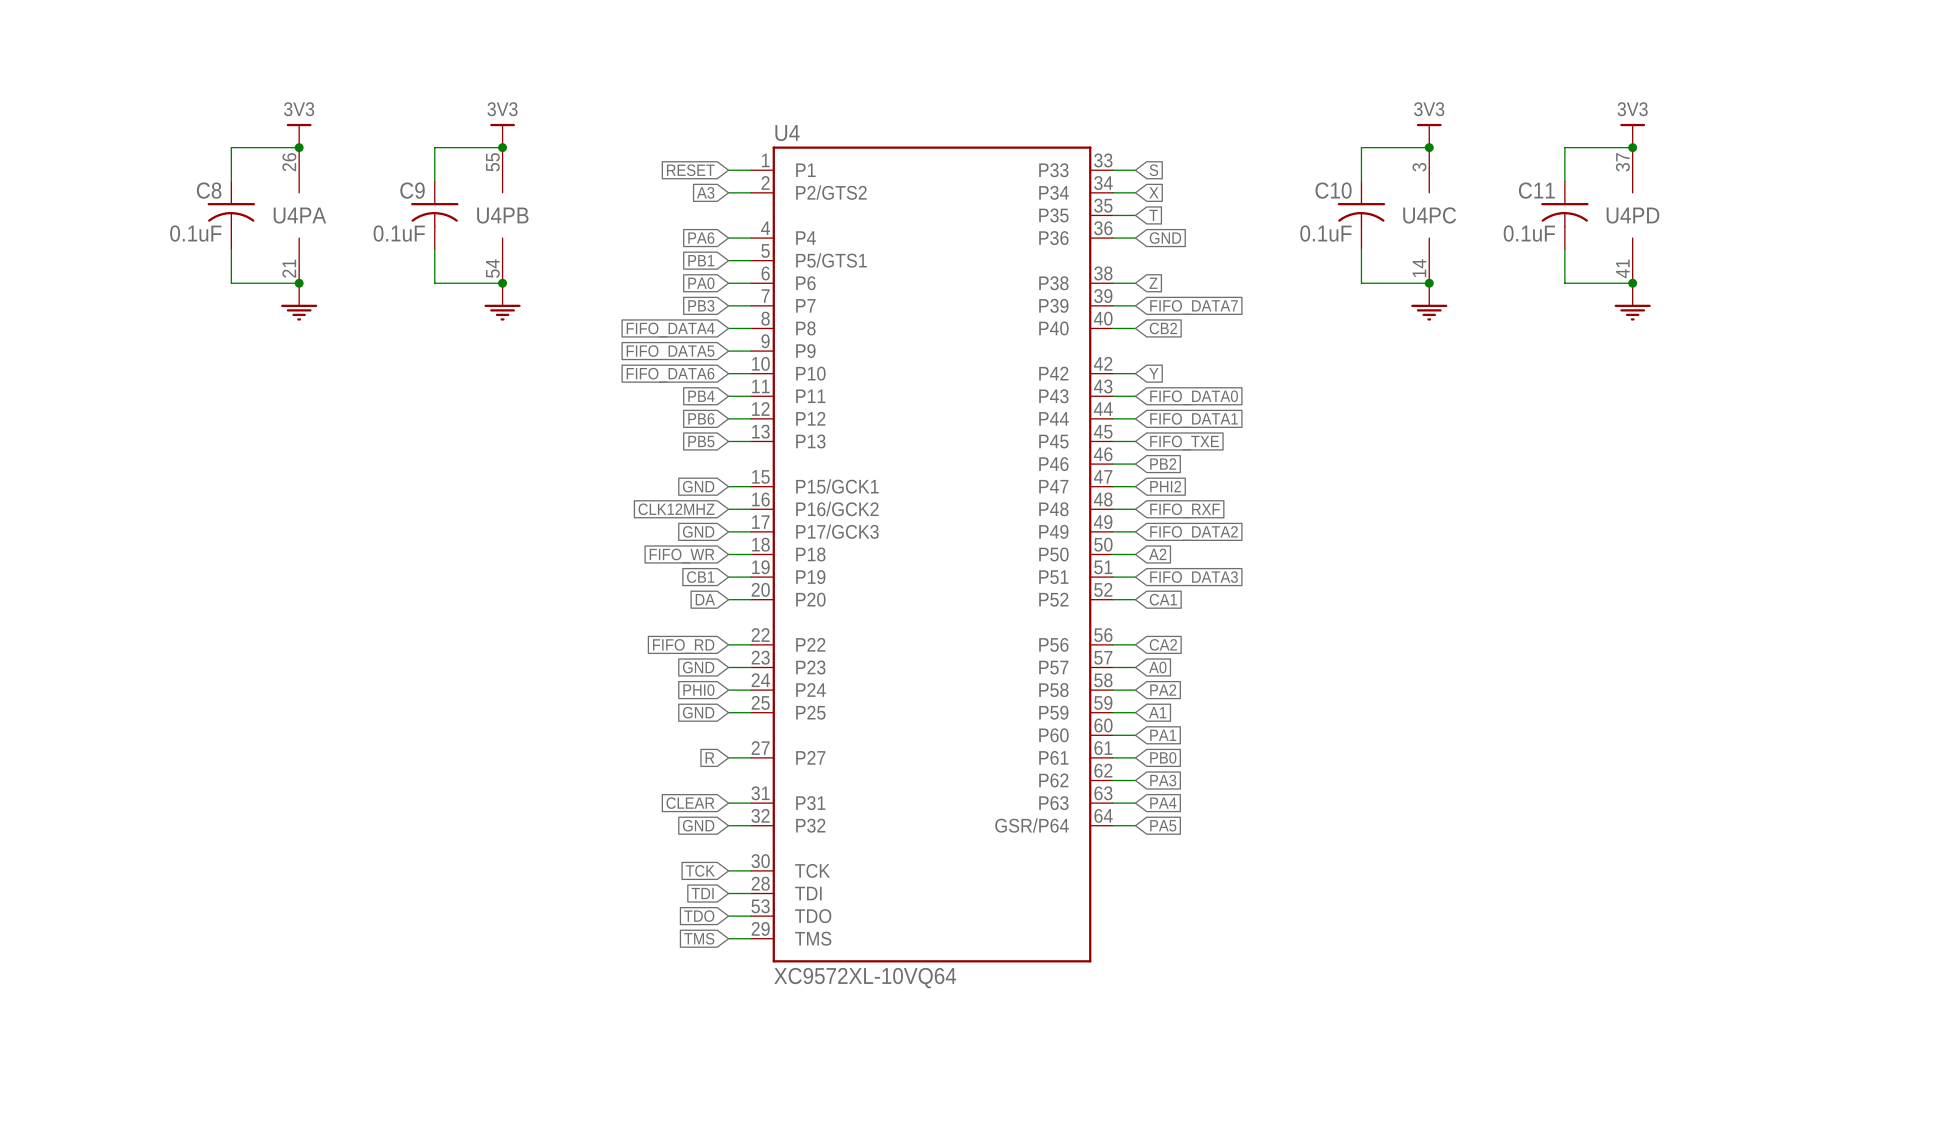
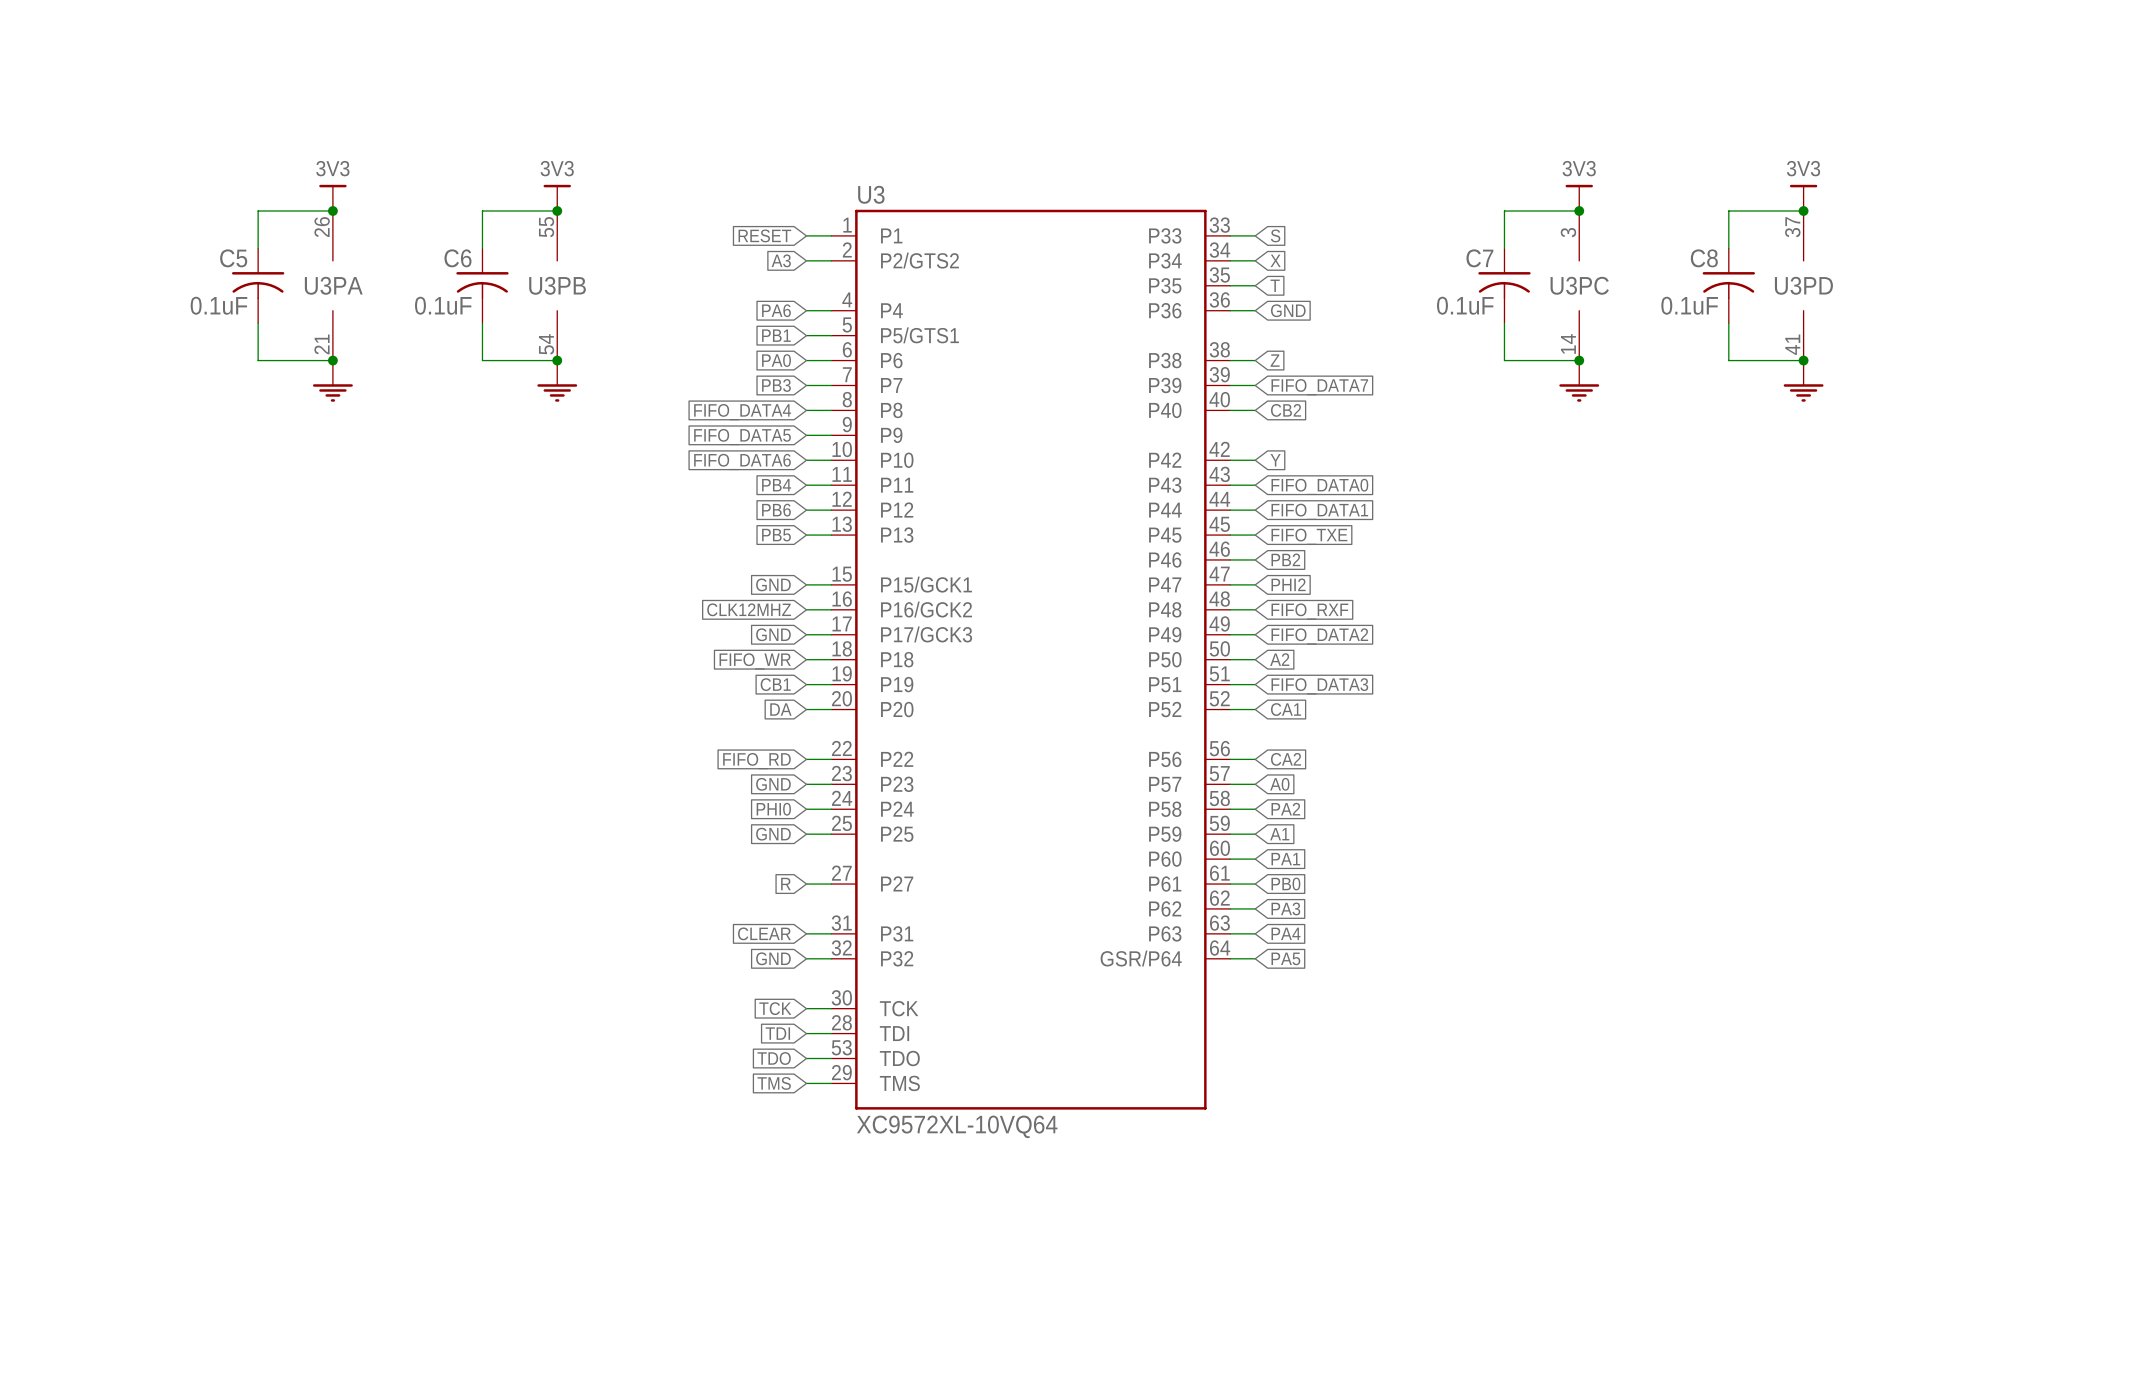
U4 name: U4 (787, 133) -> U3 (871, 194)
C8 name: C8 (209, 190) -> C5 (233, 258)
C9 name: C9 (412, 190) -> C6 (457, 258)
C10 name: C10 (1333, 190) -> C7 (1479, 258)
C11 name: C11 (1536, 190) -> C8 (1704, 258)
U4PA name: U4PA (299, 215) -> U3PA (333, 285)
U4PB name: U4PB (502, 215) -> U3PB (557, 285)
U4PC name: U4PC (1429, 215) -> U3PC (1579, 285)
U4PD name: U4PD (1632, 215) -> U3PD (1803, 285)

